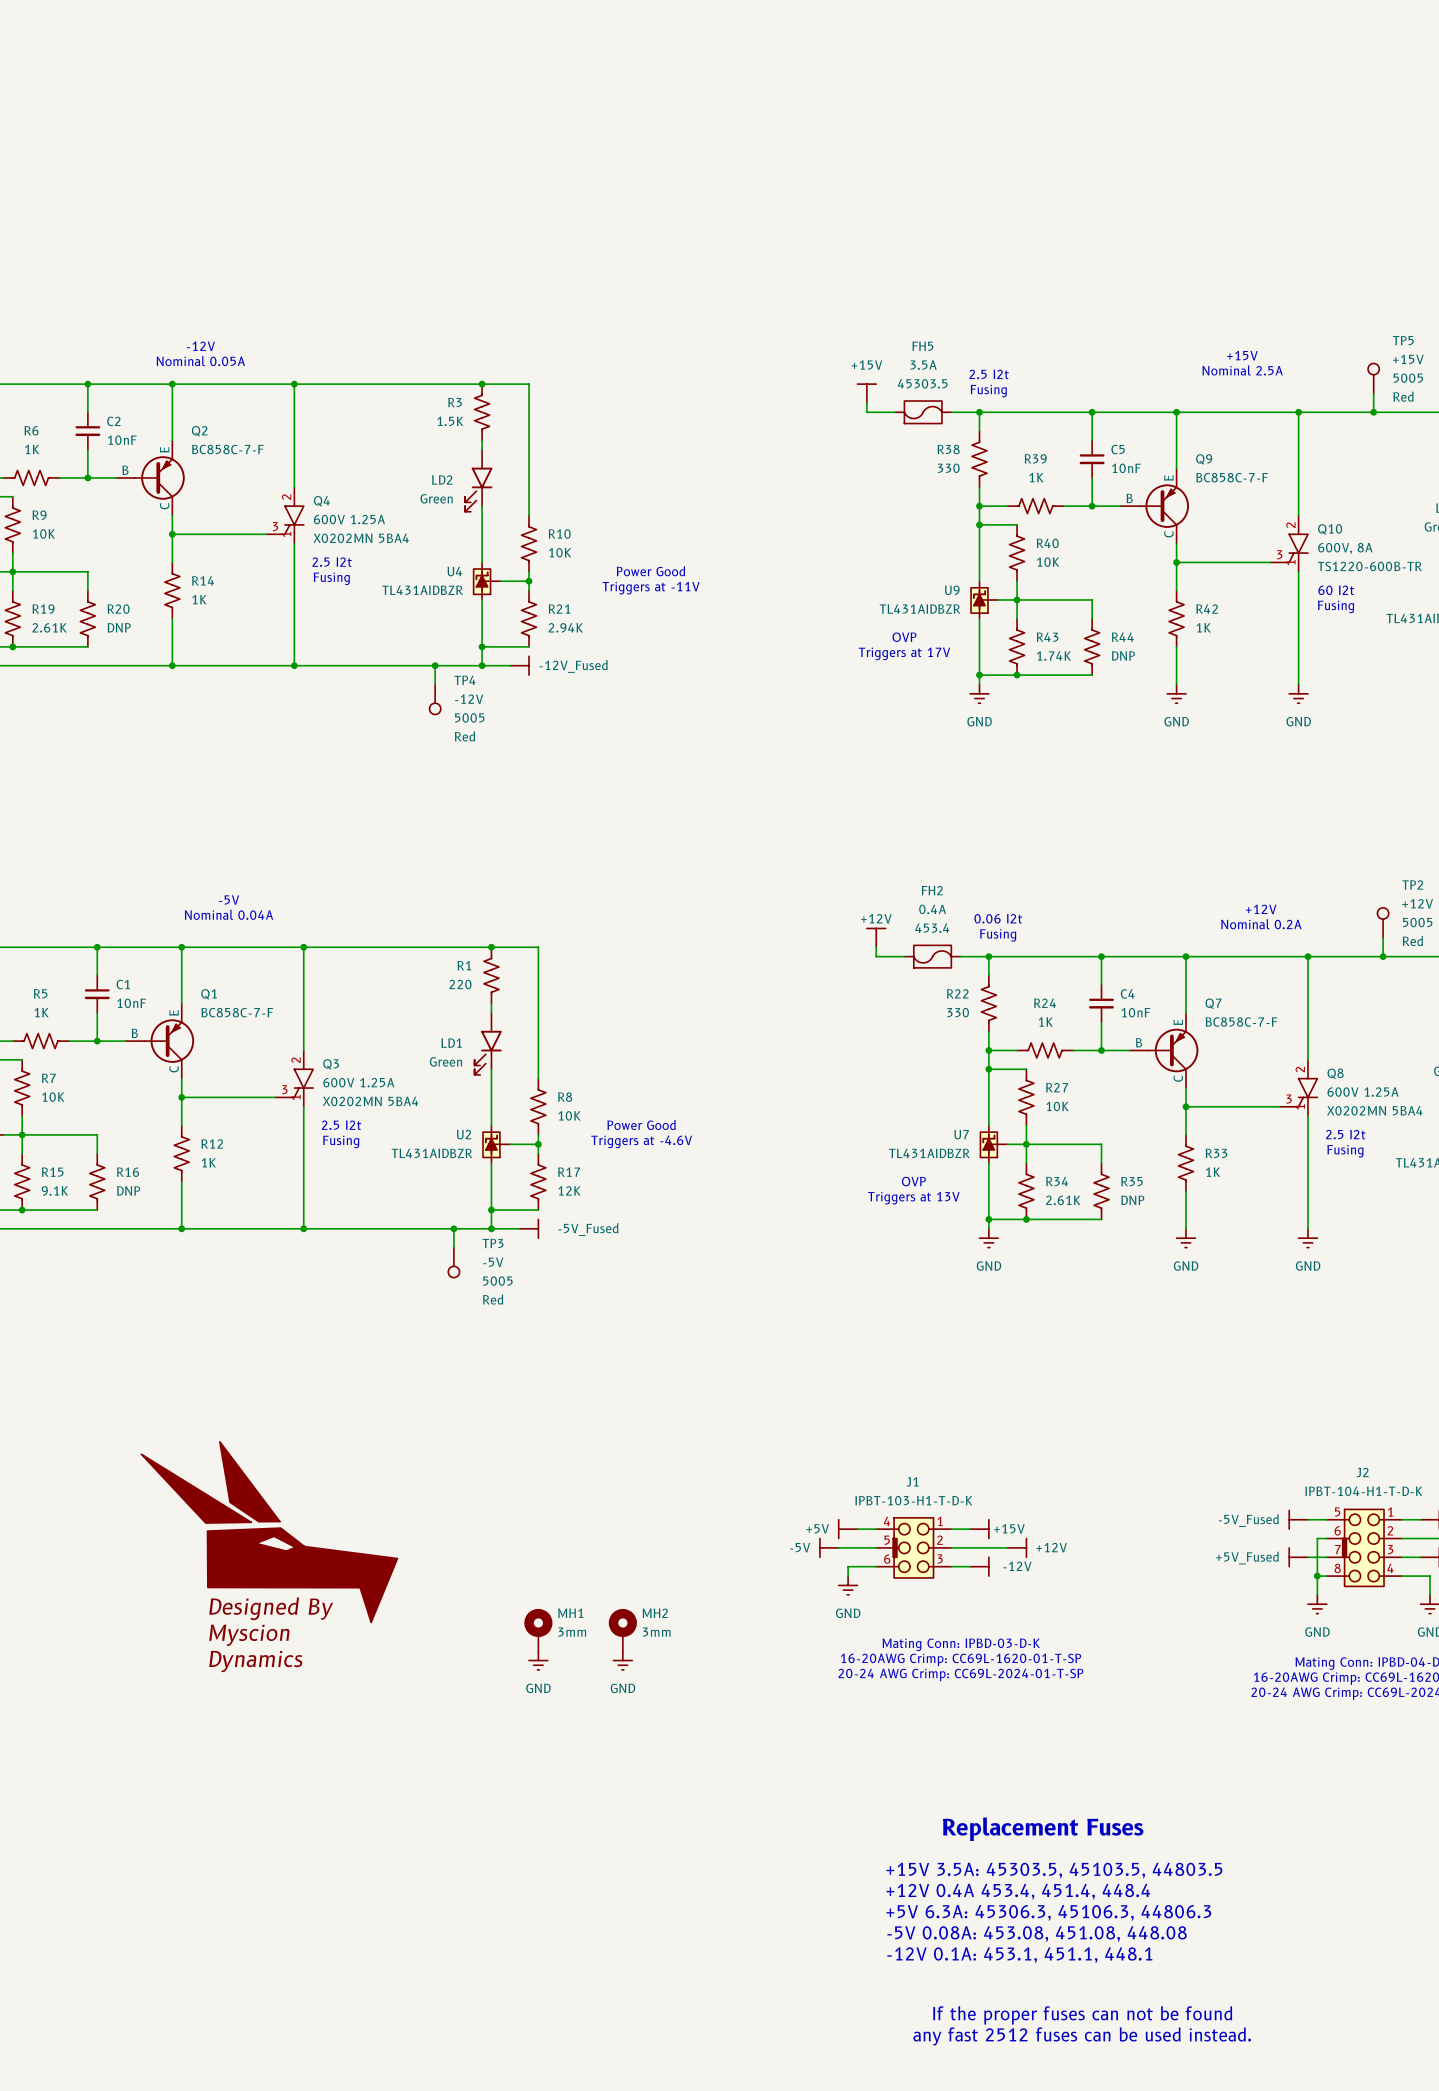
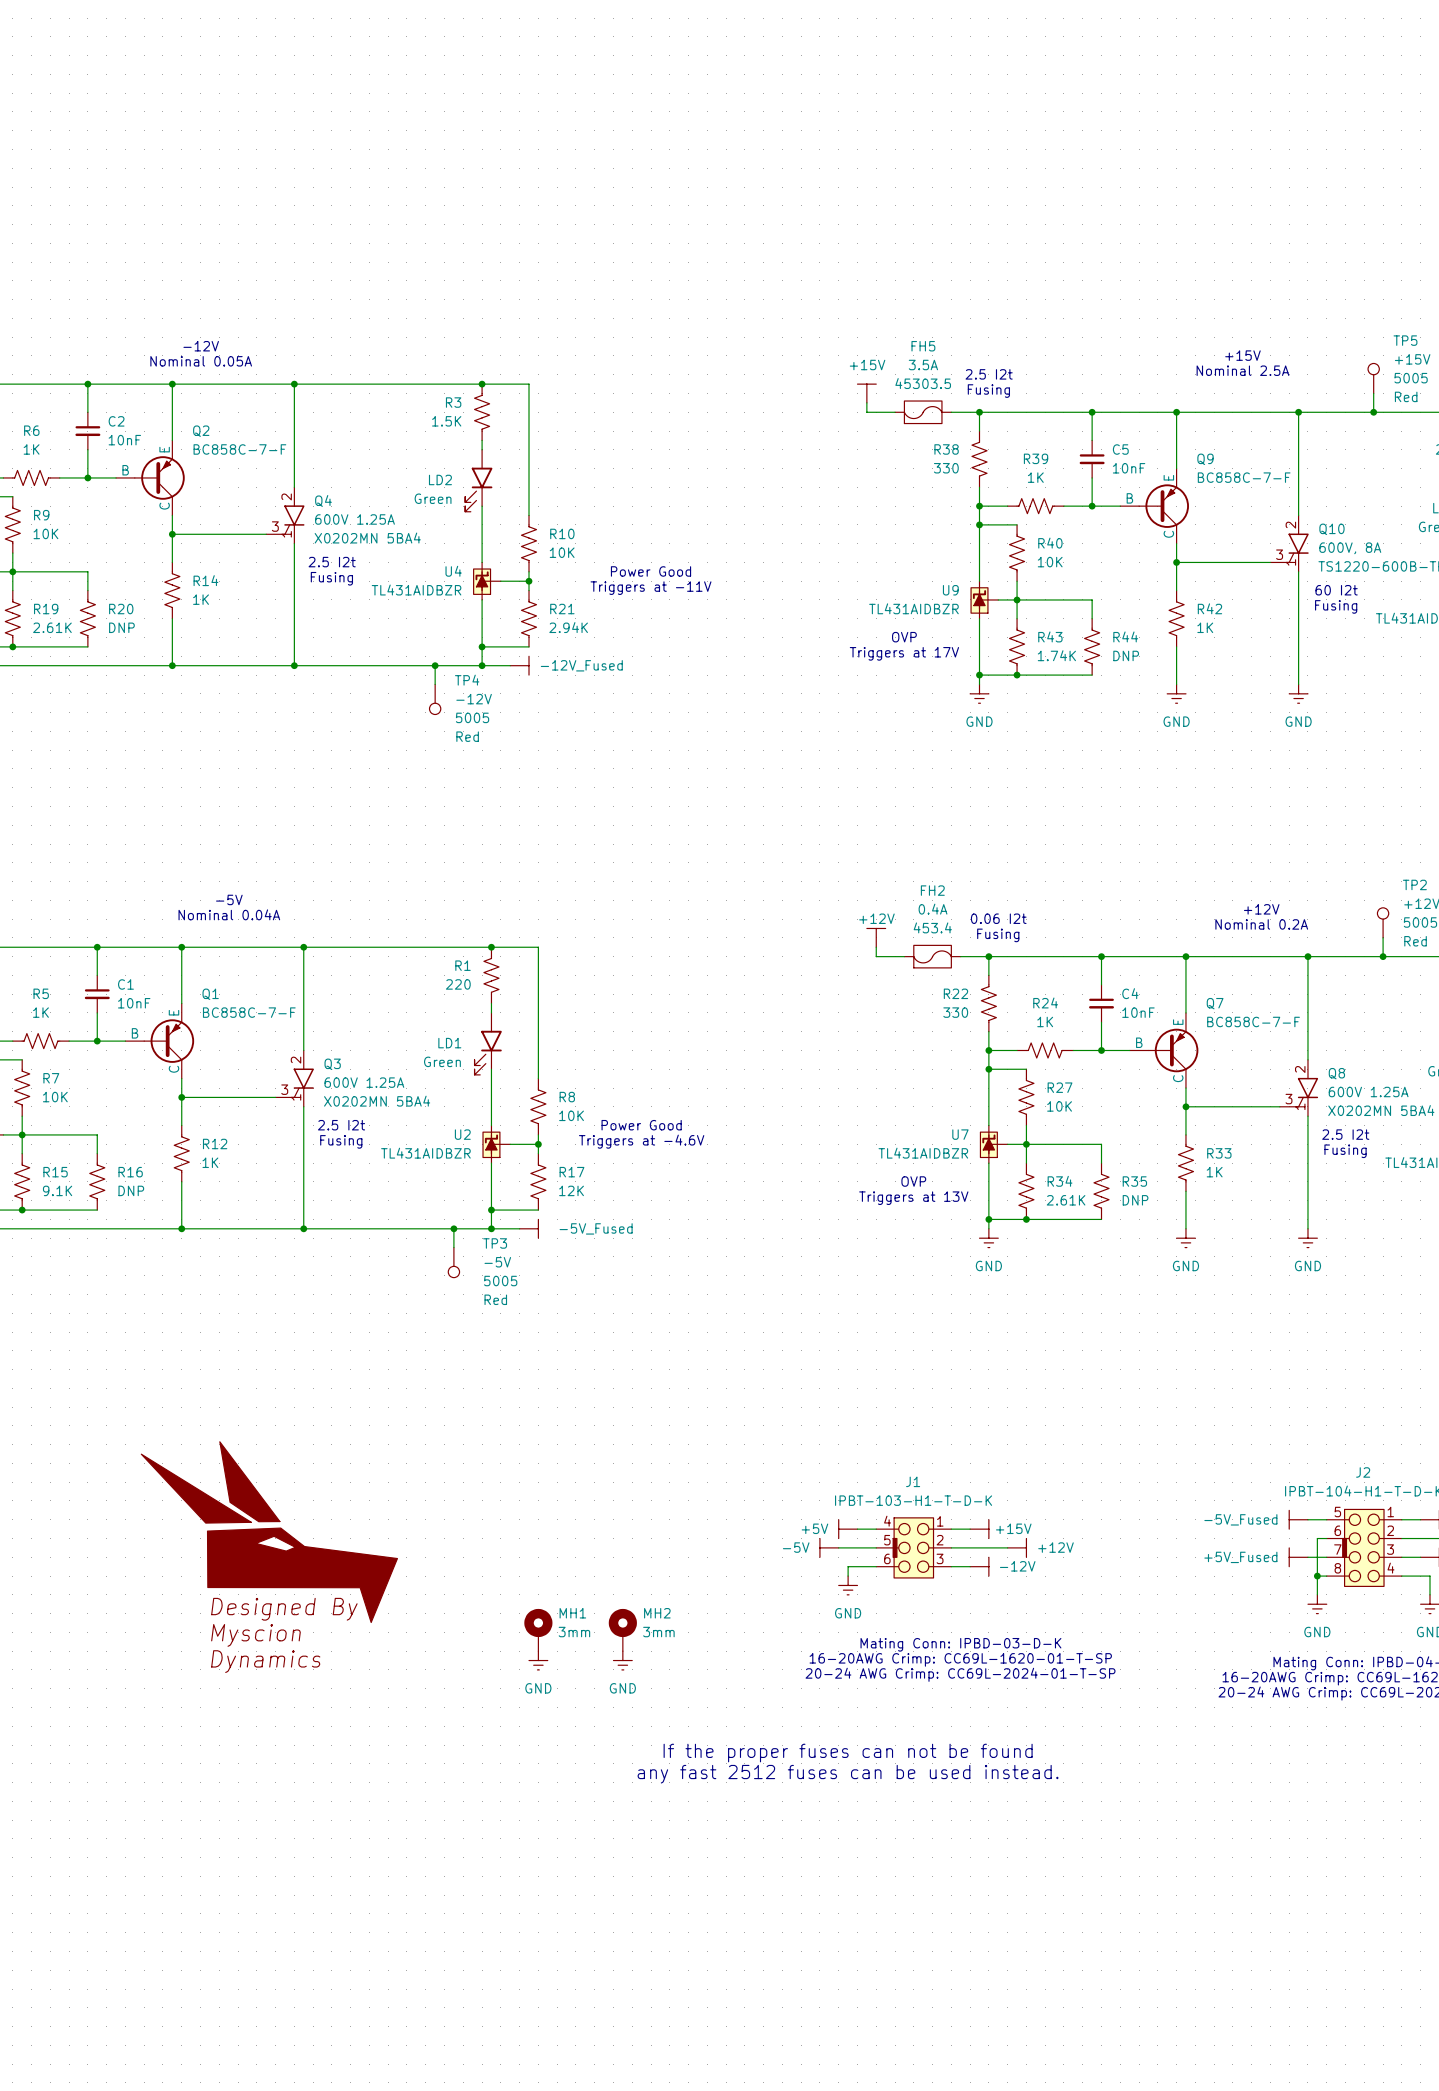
text: none -> If the proper fuses can not be found (848, 1753)
text: none -> any fast 2512 fuses can be used instead. (848, 1774)
text: Replacement Fuses (1043, 1829) -> none
text: +15V 3.5A: 45303.5, 45103.5, 44803.5 (1054, 1870) -> none
text: +12V 0.4A 453.4, 451.4, 448.4 (1018, 1891) -> none
text: +5V 6.3A: 45306.3, 45106.3, 44806.3 (1048, 1912) -> none
text: -5V 0.08A: 453.08, 451.08, 448.08 (1037, 1934) -> none
text: -12V 0.1A: 453.1, 451.1, 448.1 (1019, 1955) -> none
text: If the proper fuses can not be found (1082, 2015) -> none
text: any fast 2512 fuses can be used instead. (1082, 2036) -> none

